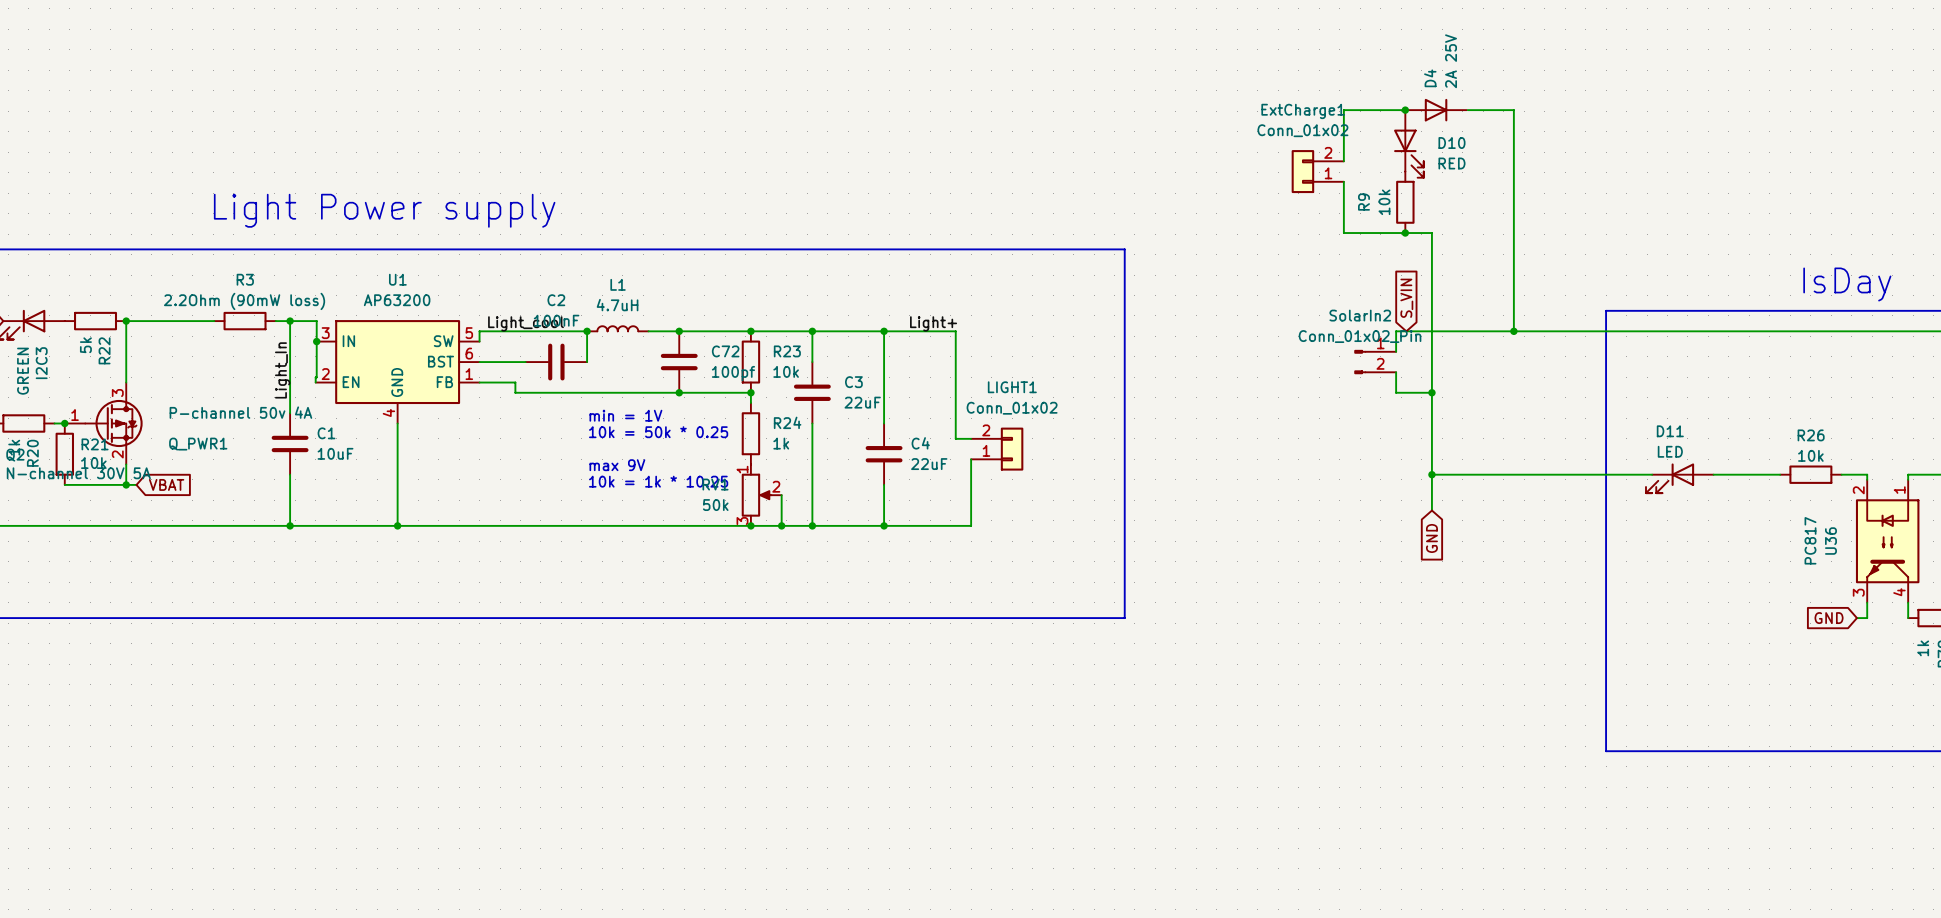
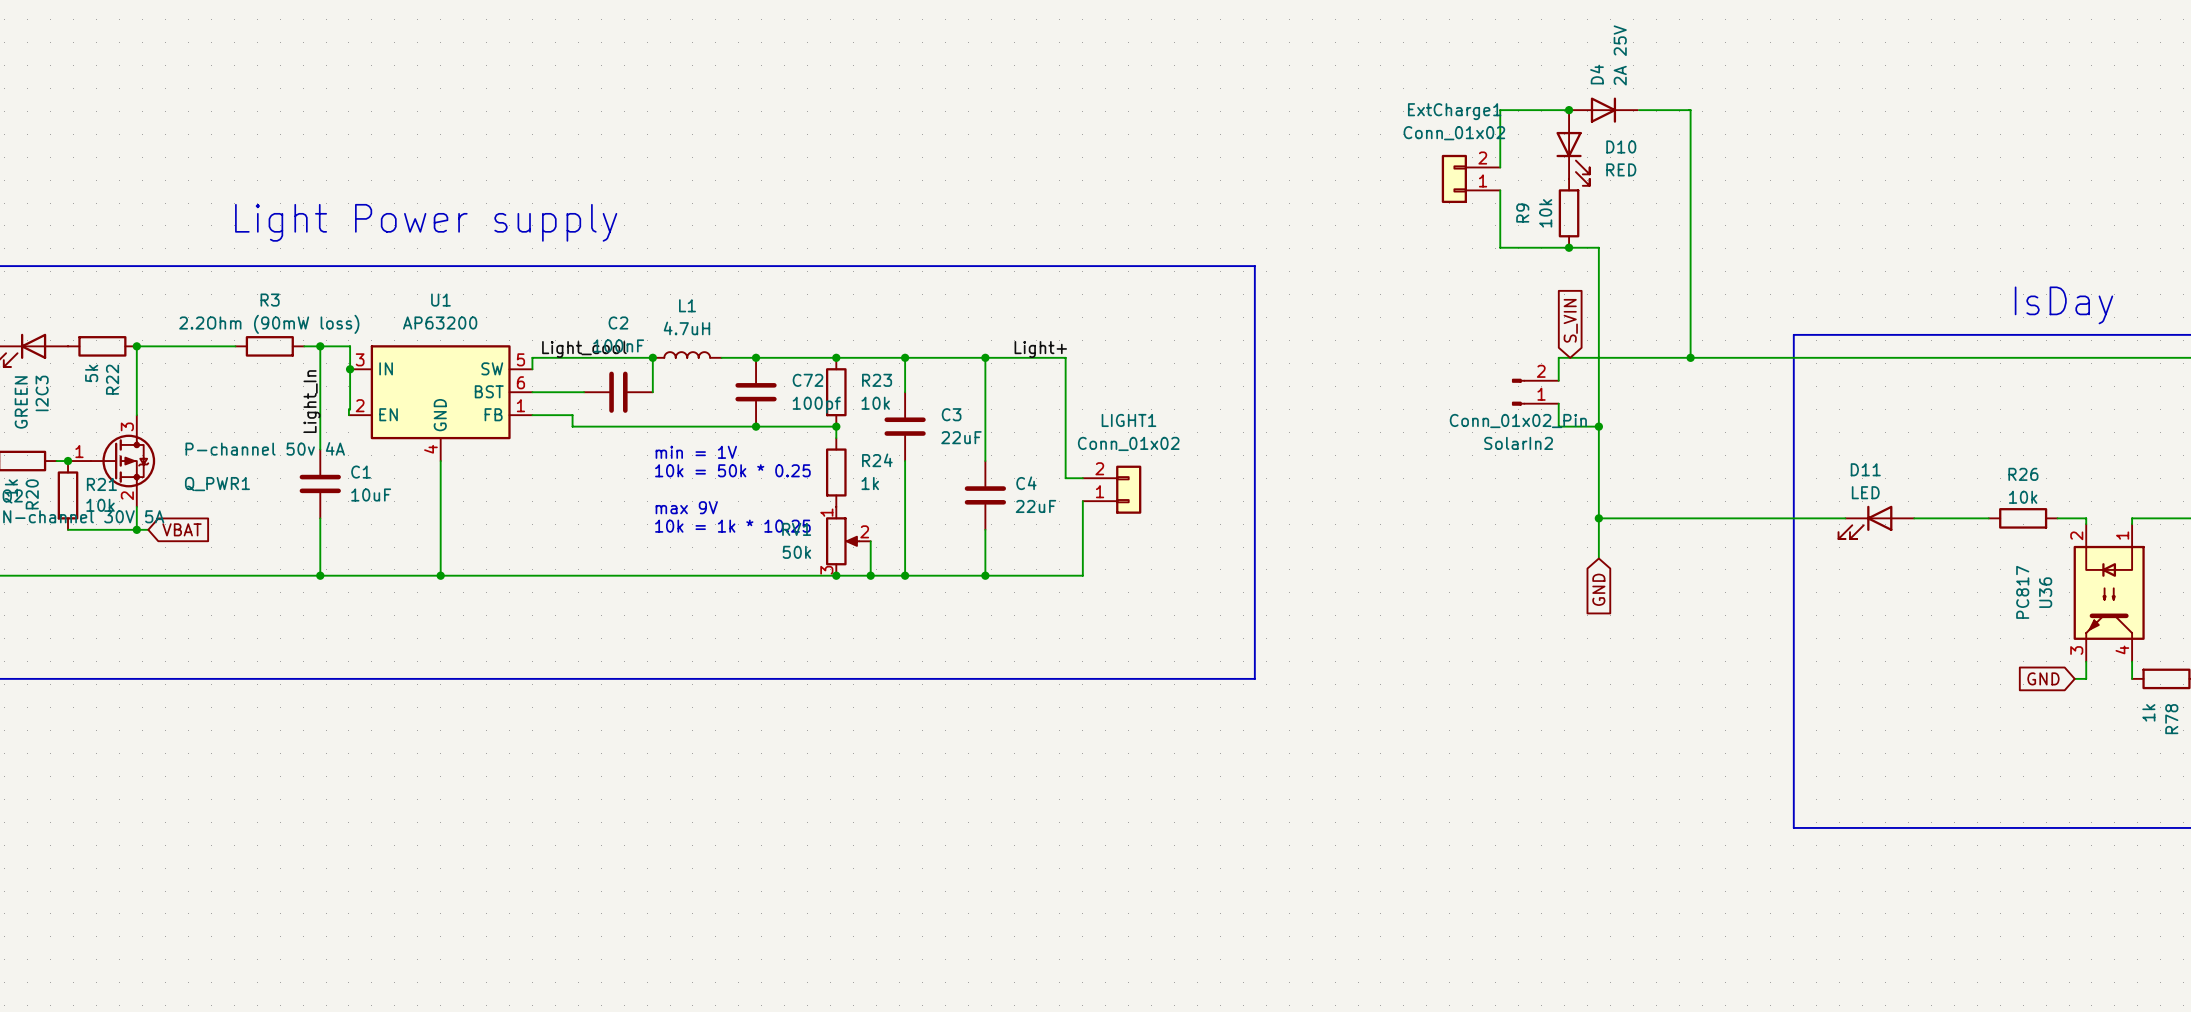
SolarIn2 flip: as is (1360, 362) -> up-down (1518, 392)

